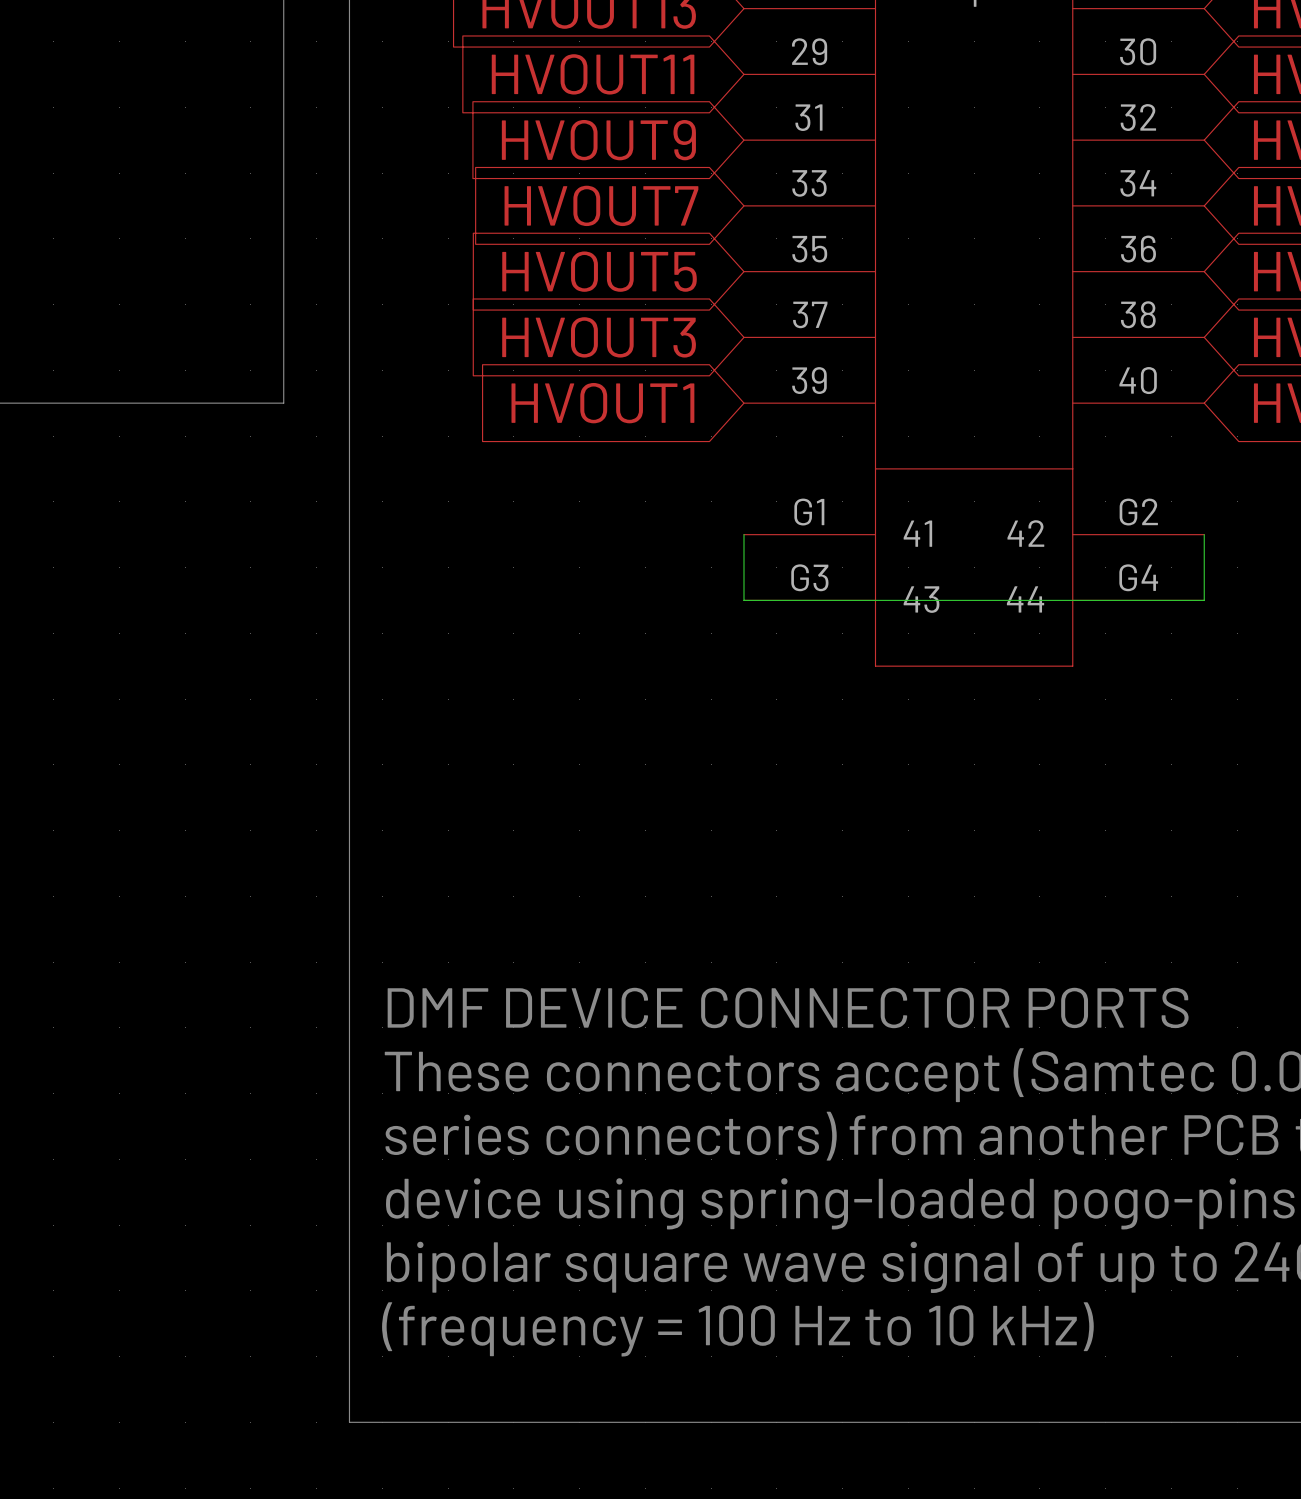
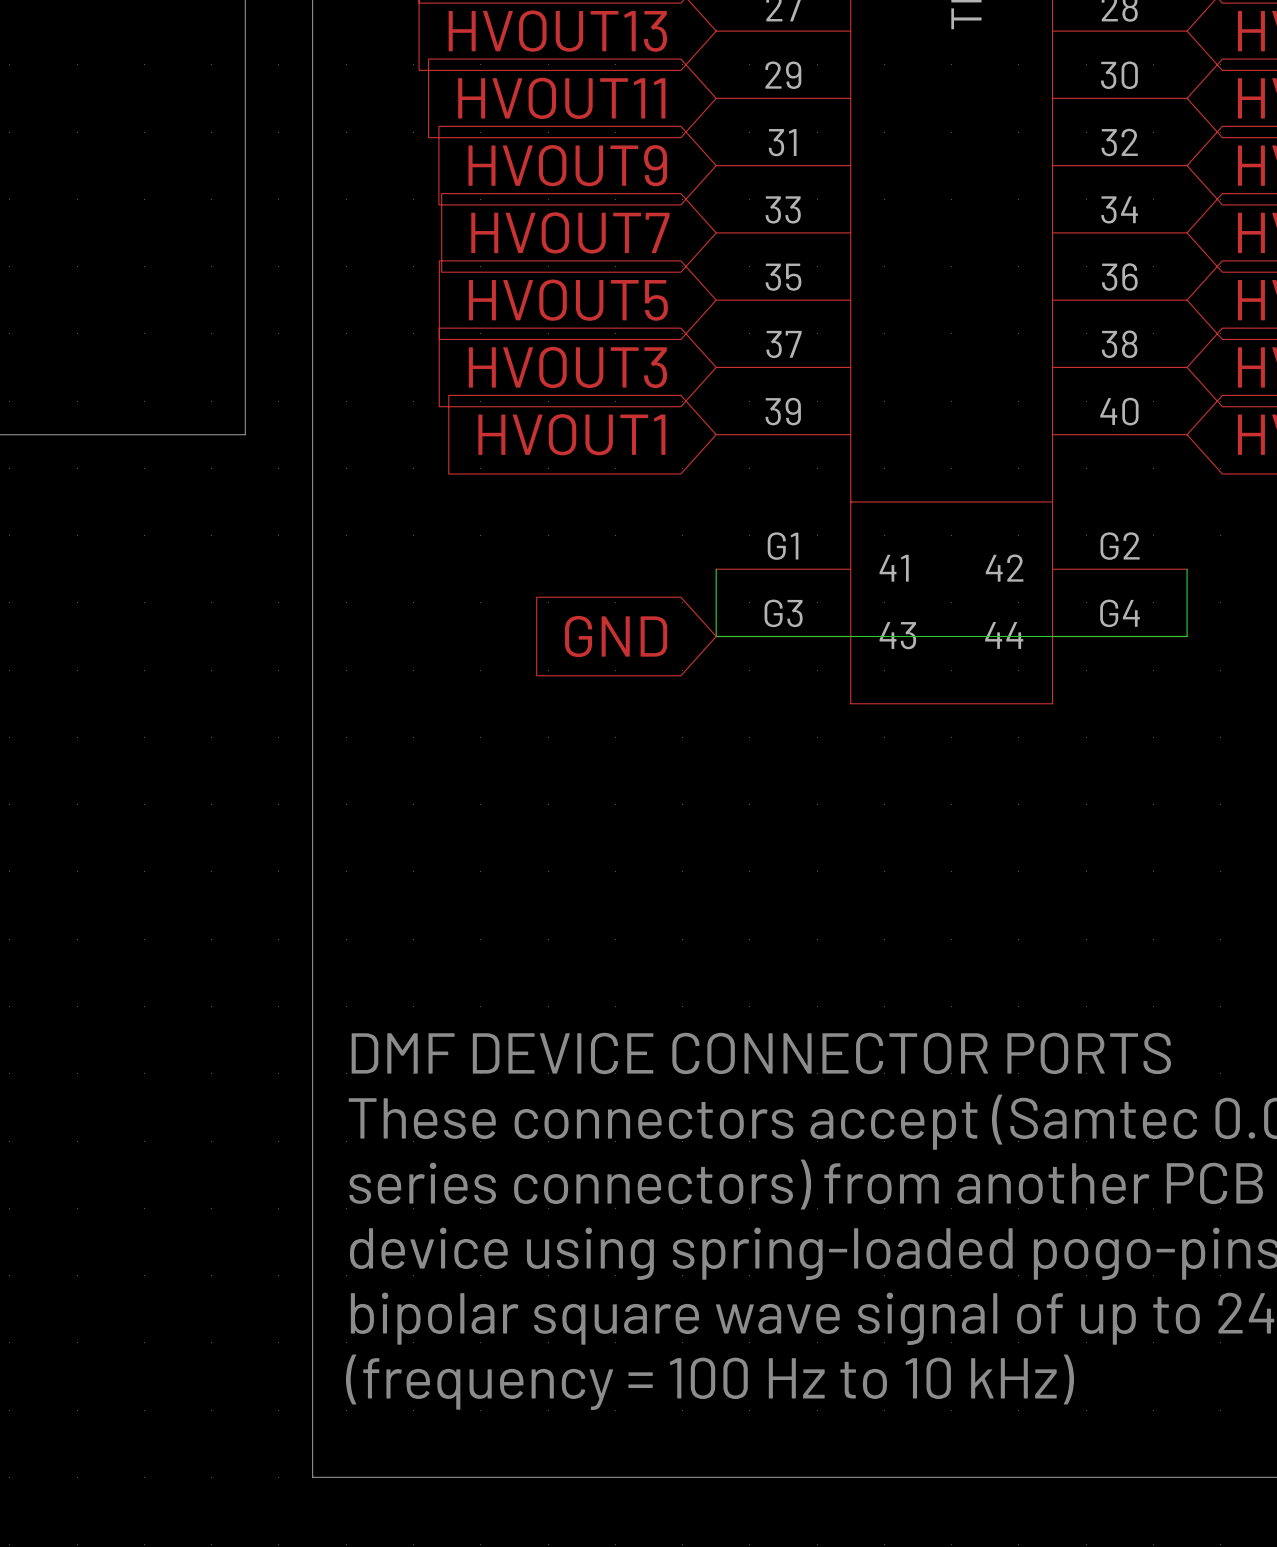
global label: none -> GND (616, 636)

